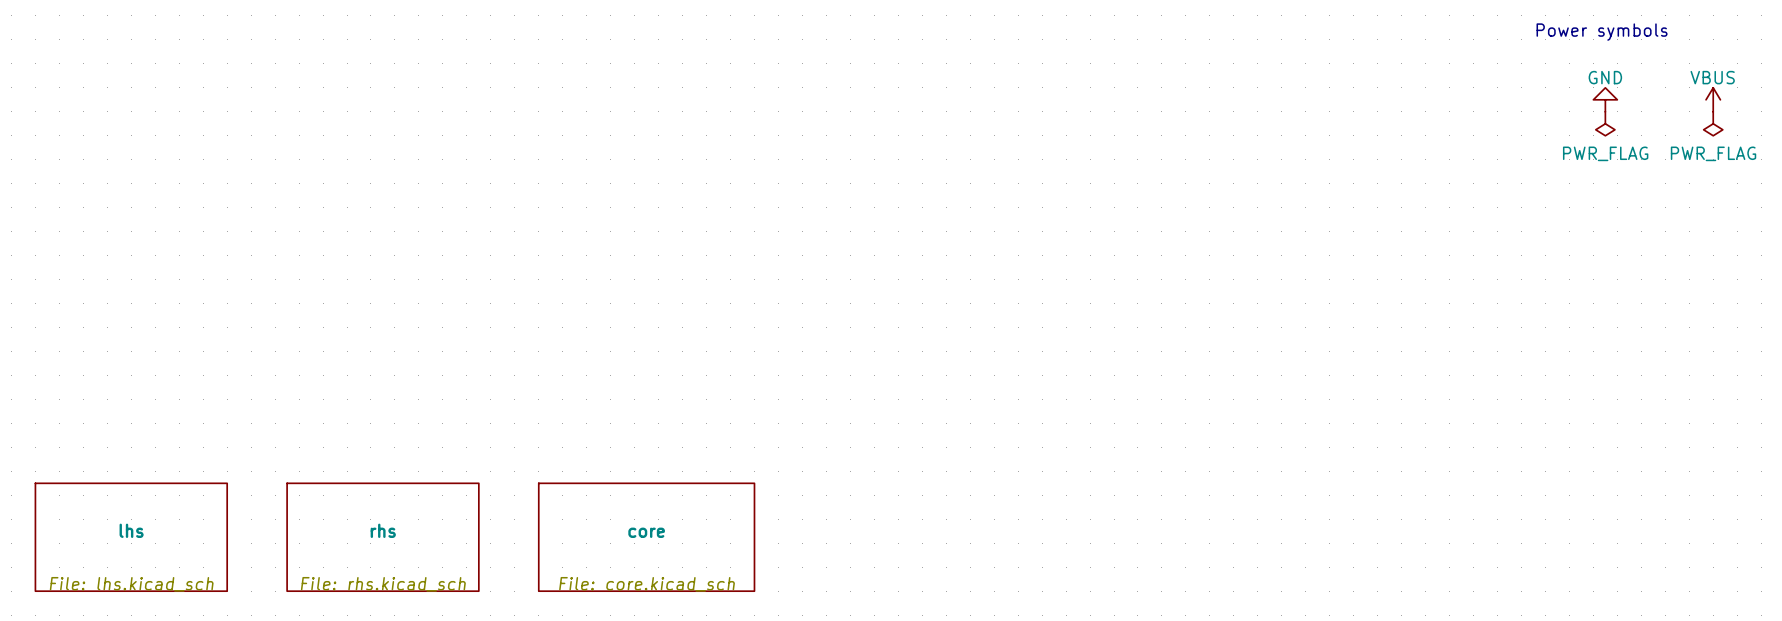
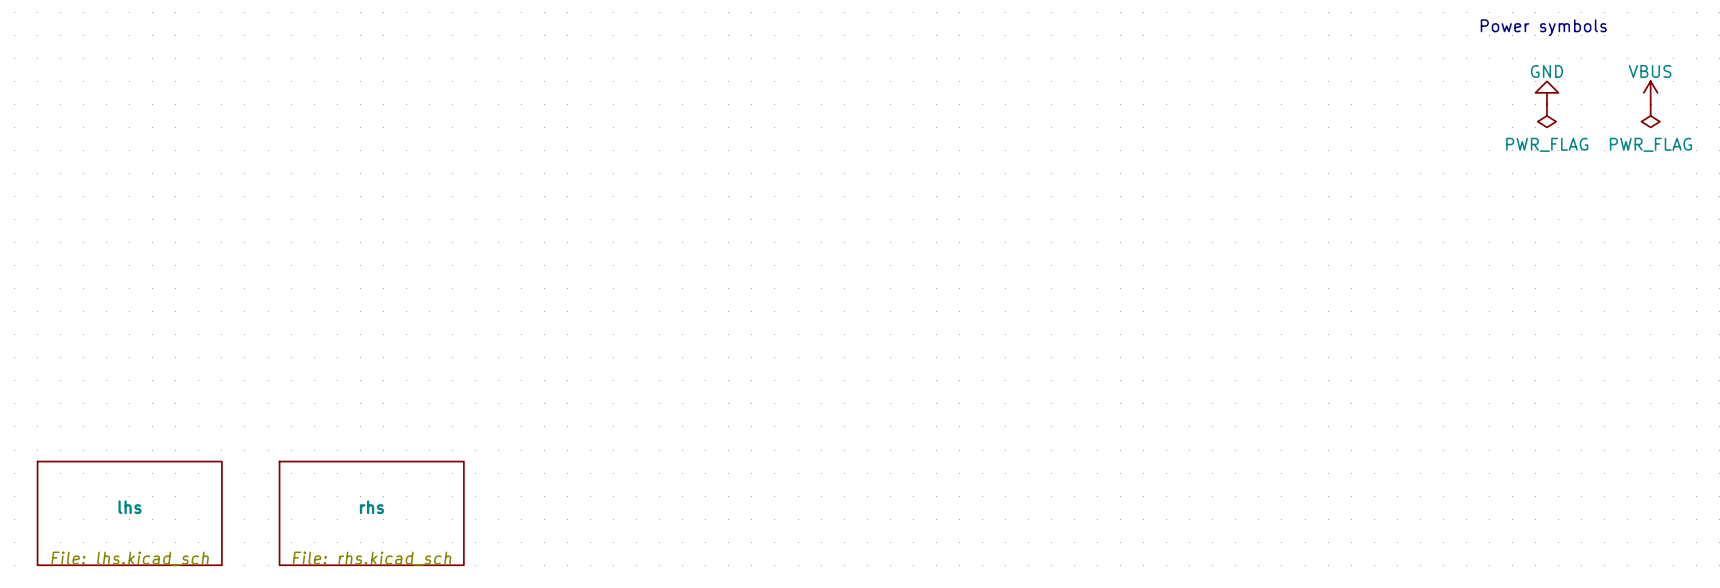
sheet core: File: core.kicad_sch (646, 537) -> none

